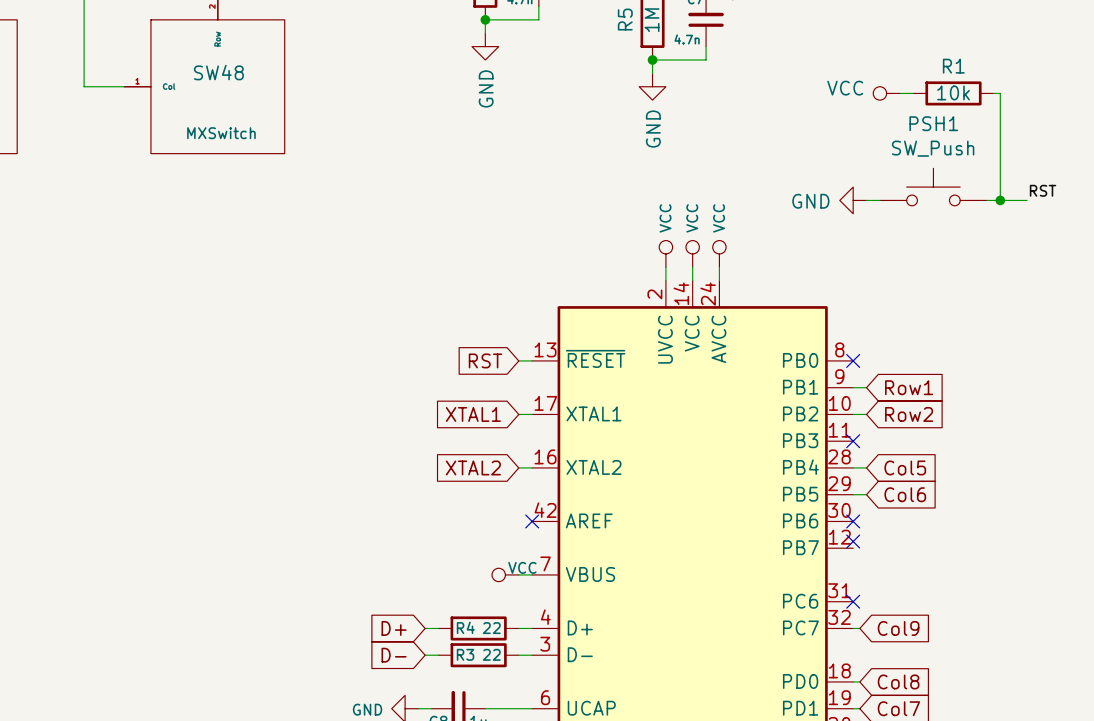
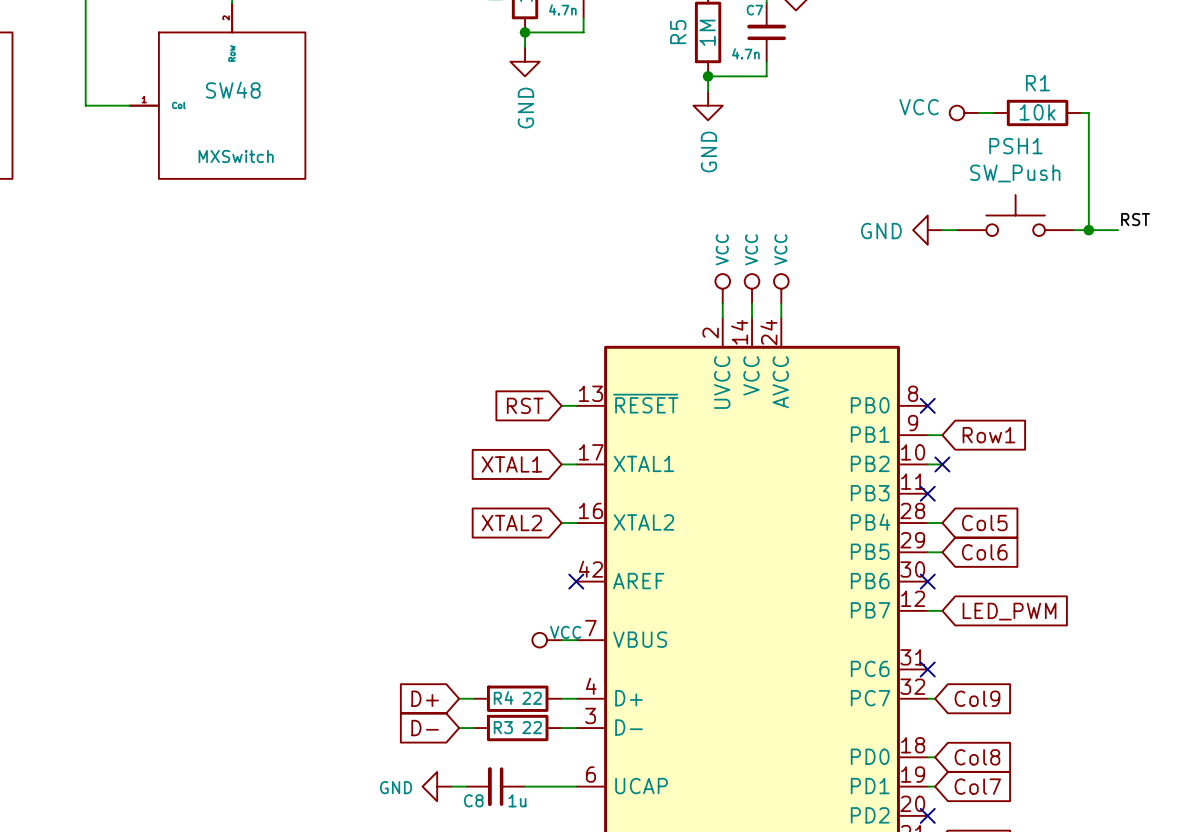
no-connect mark: none -> (942, 464)
global label: Row2 (909, 414) -> none
no-connect mark: (853, 541) -> none
wire: none -> (927, 610) (942, 610)
global label: none -> LED_PWM (1009, 611)

